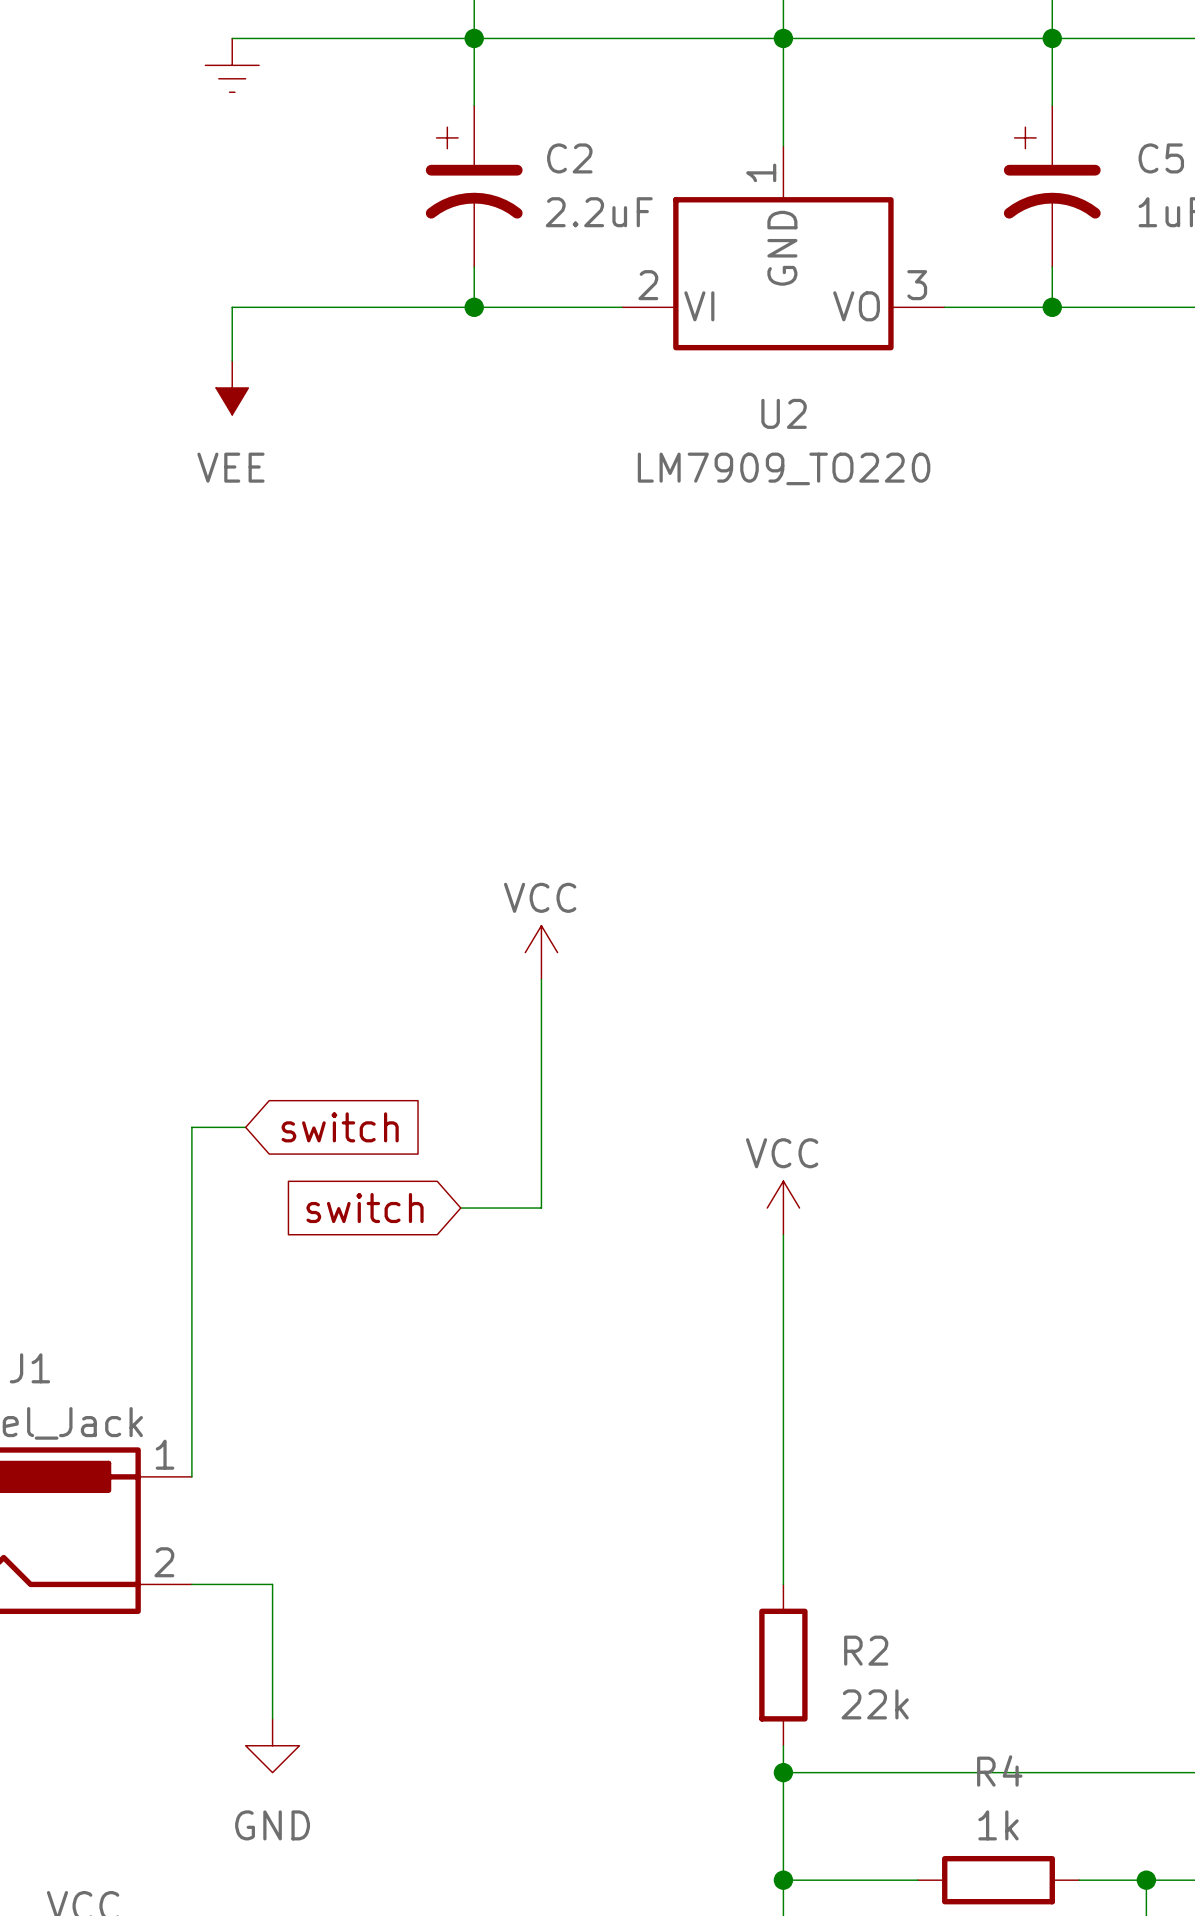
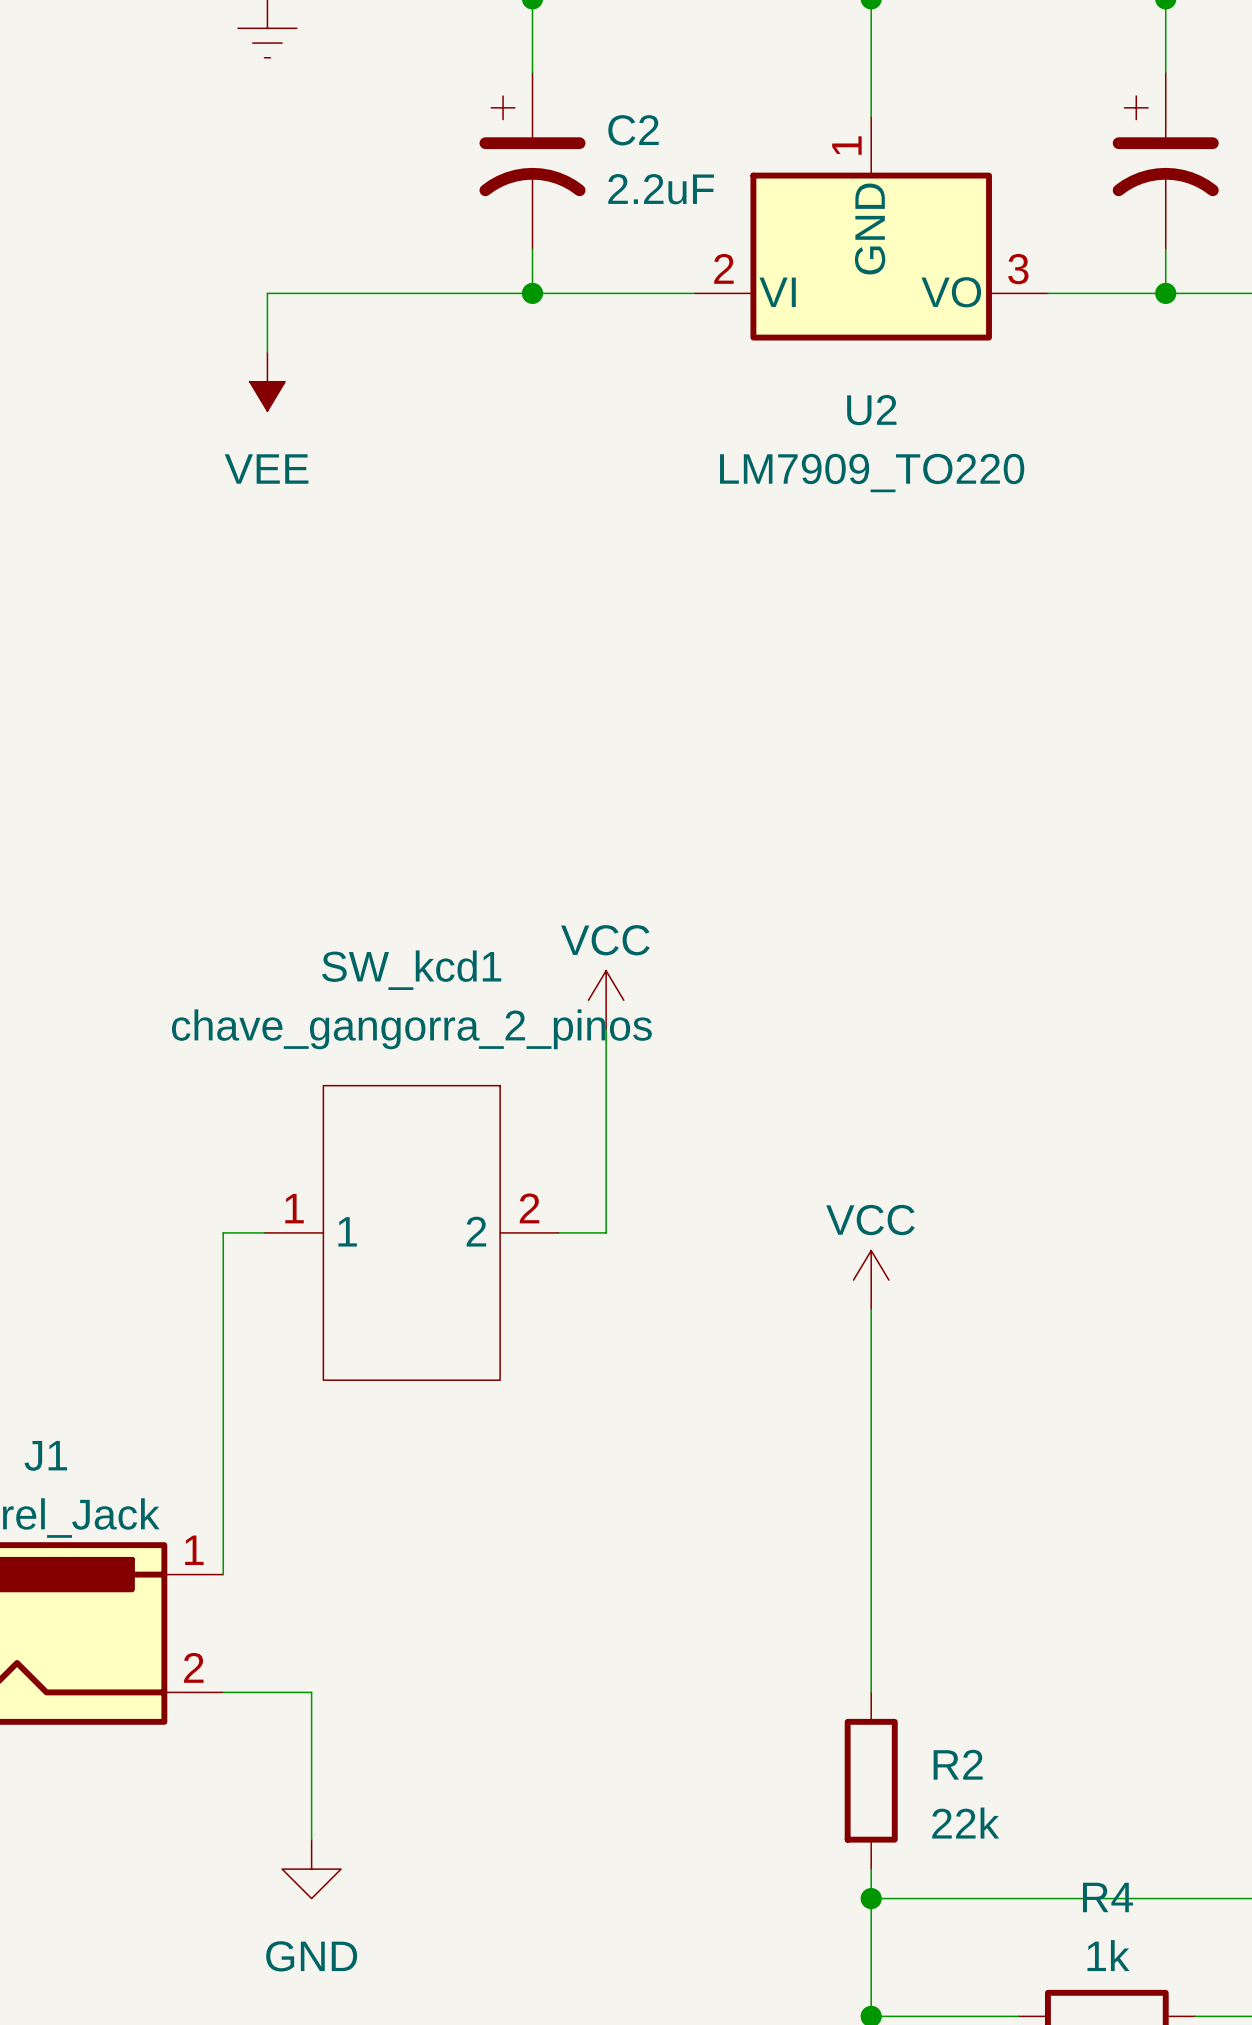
wire: (245, 1127) (191, 1127) (191, 1165) -> (264, 1232) (223, 1232)
global label: switch (340, 1127) -> none
SW_kcd1: none -> chave_gangorra_2_pinos (411, 1232)
wire: (541, 1165) (541, 1208) (460, 1208) -> (606, 1232) (559, 1232)
global label: switch (365, 1208) -> none

